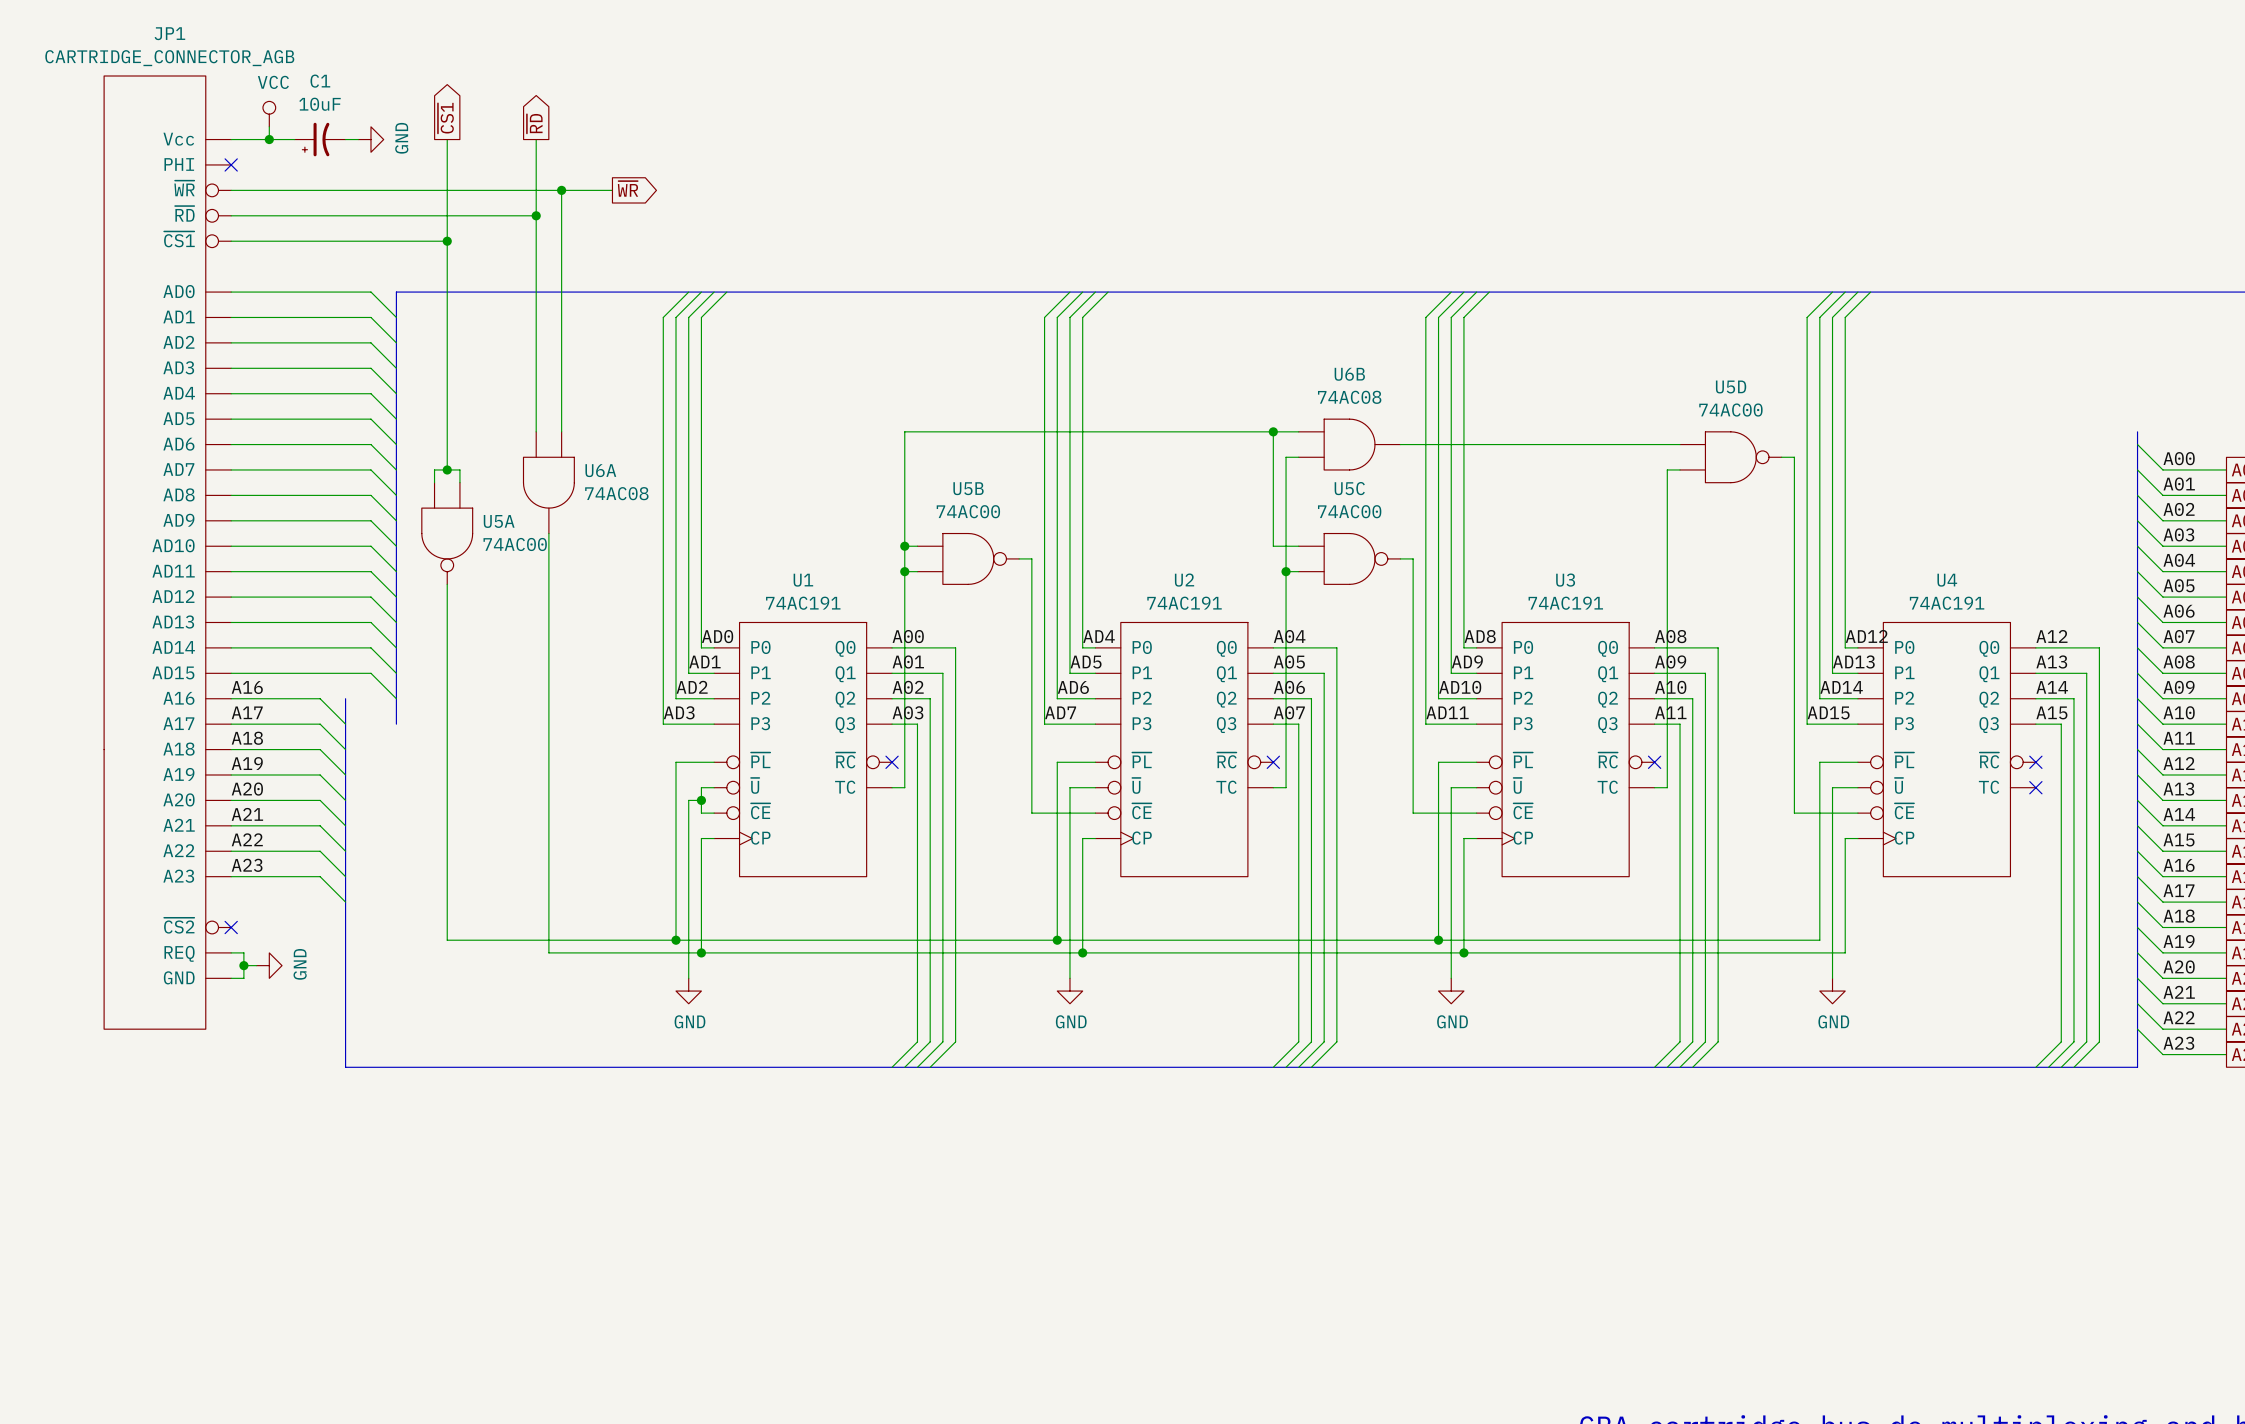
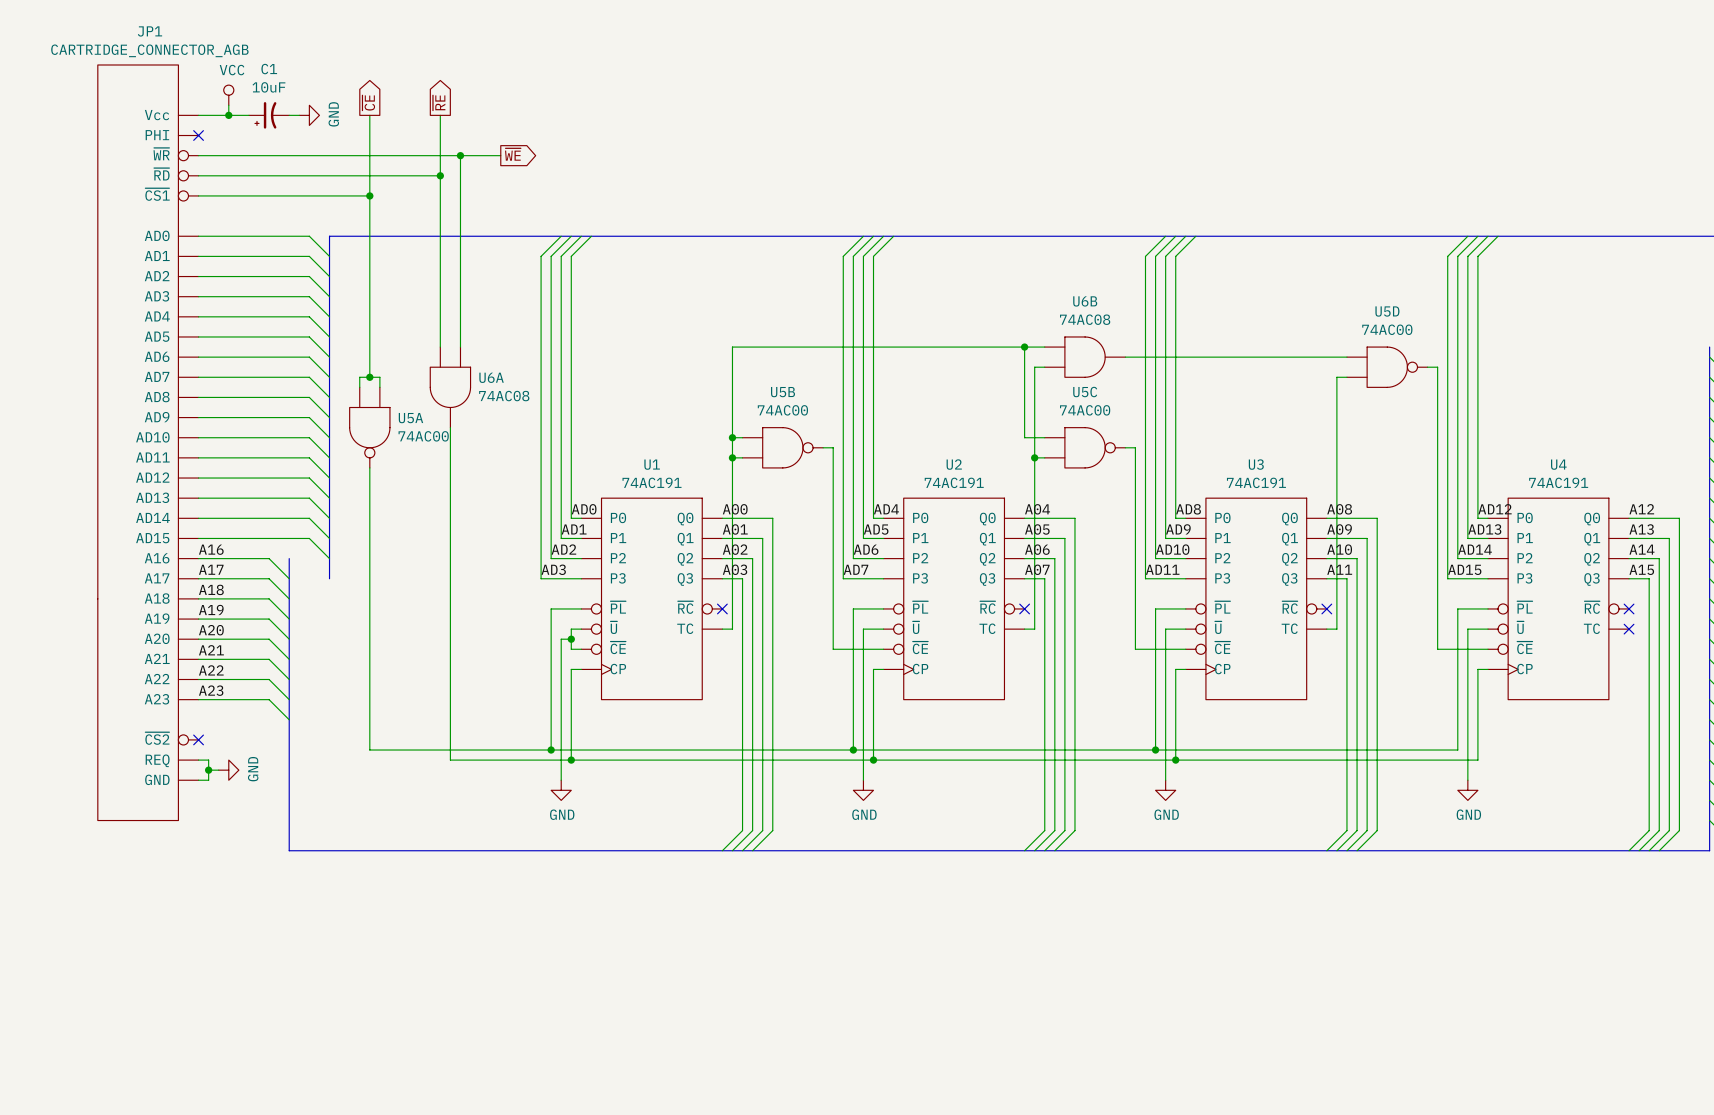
global label: ~{CS1} (445, 118) -> ~{CE} (368, 102)
global label: ~{RD} (534, 123) -> ~{RE} (439, 102)
global label: ~{WR} (628, 188) -> ~{WE} (512, 154)

